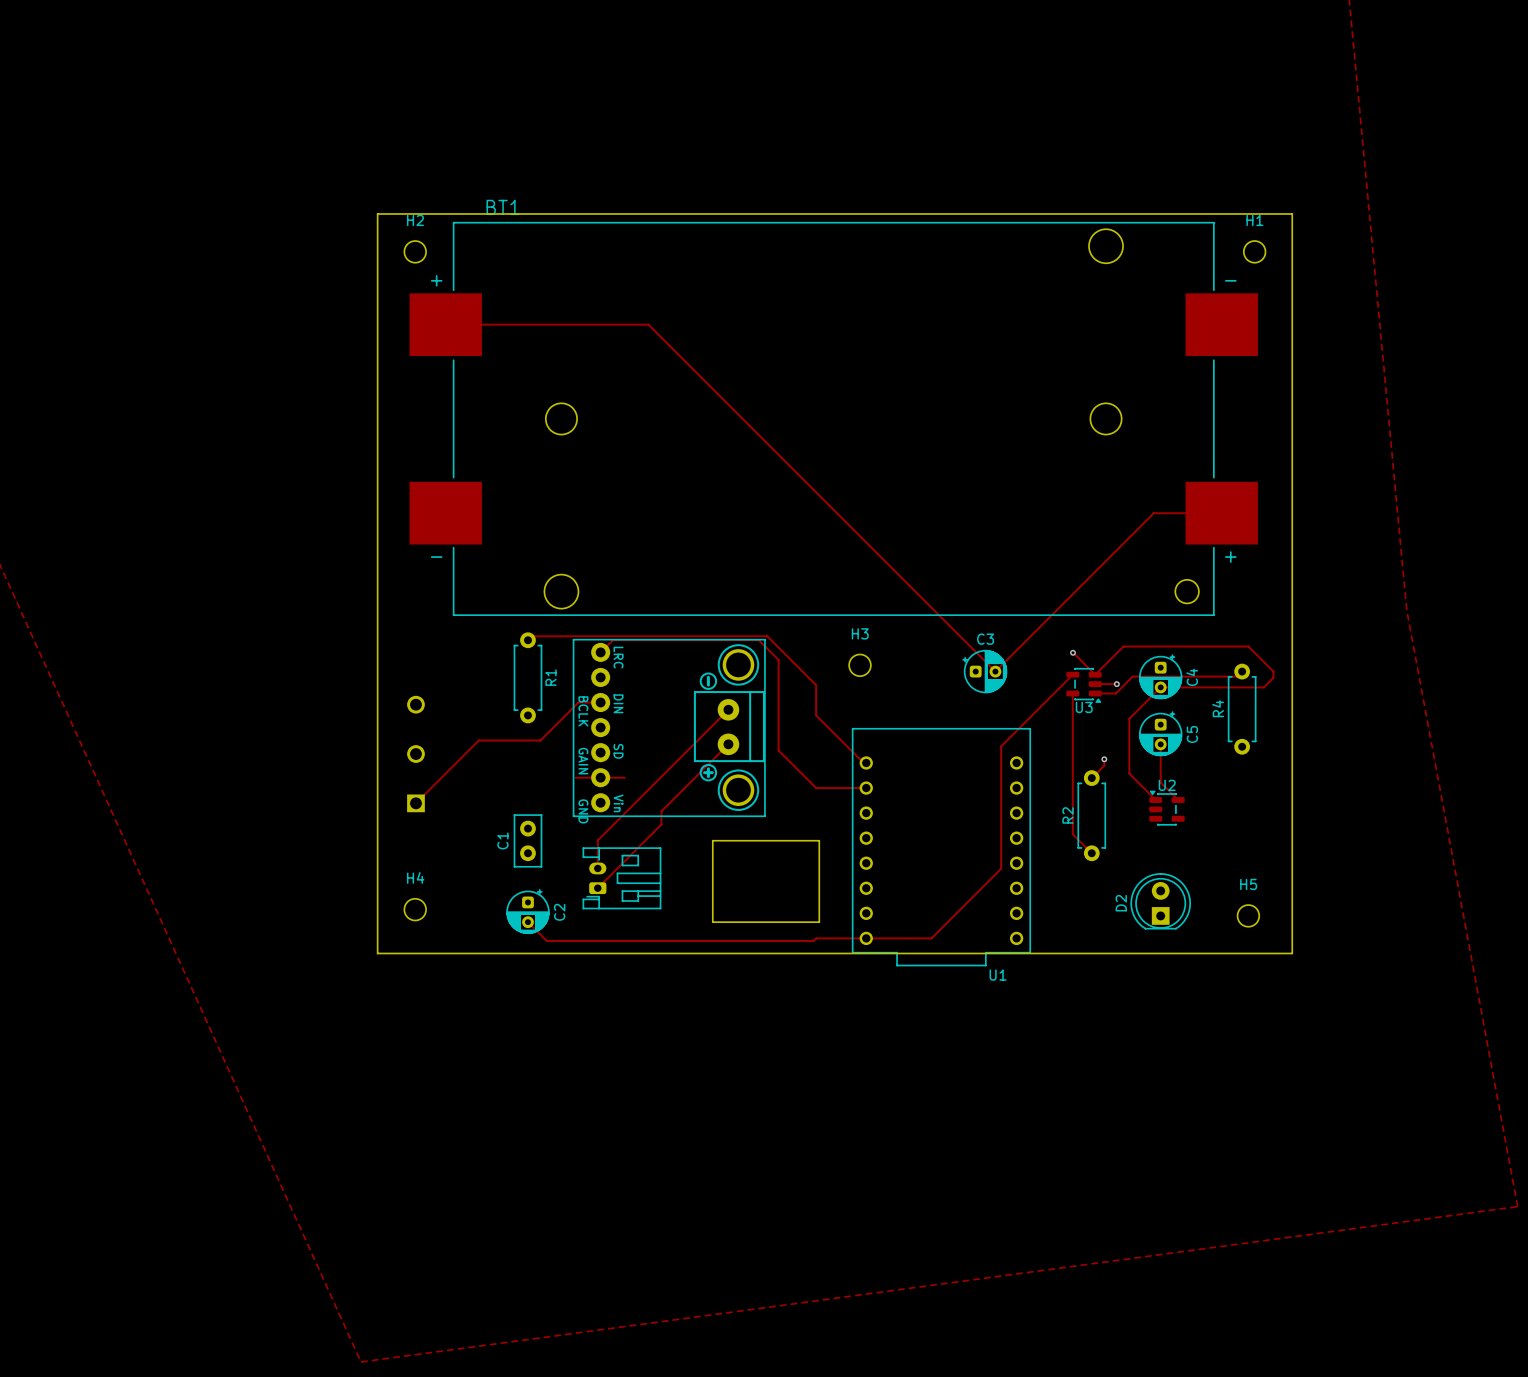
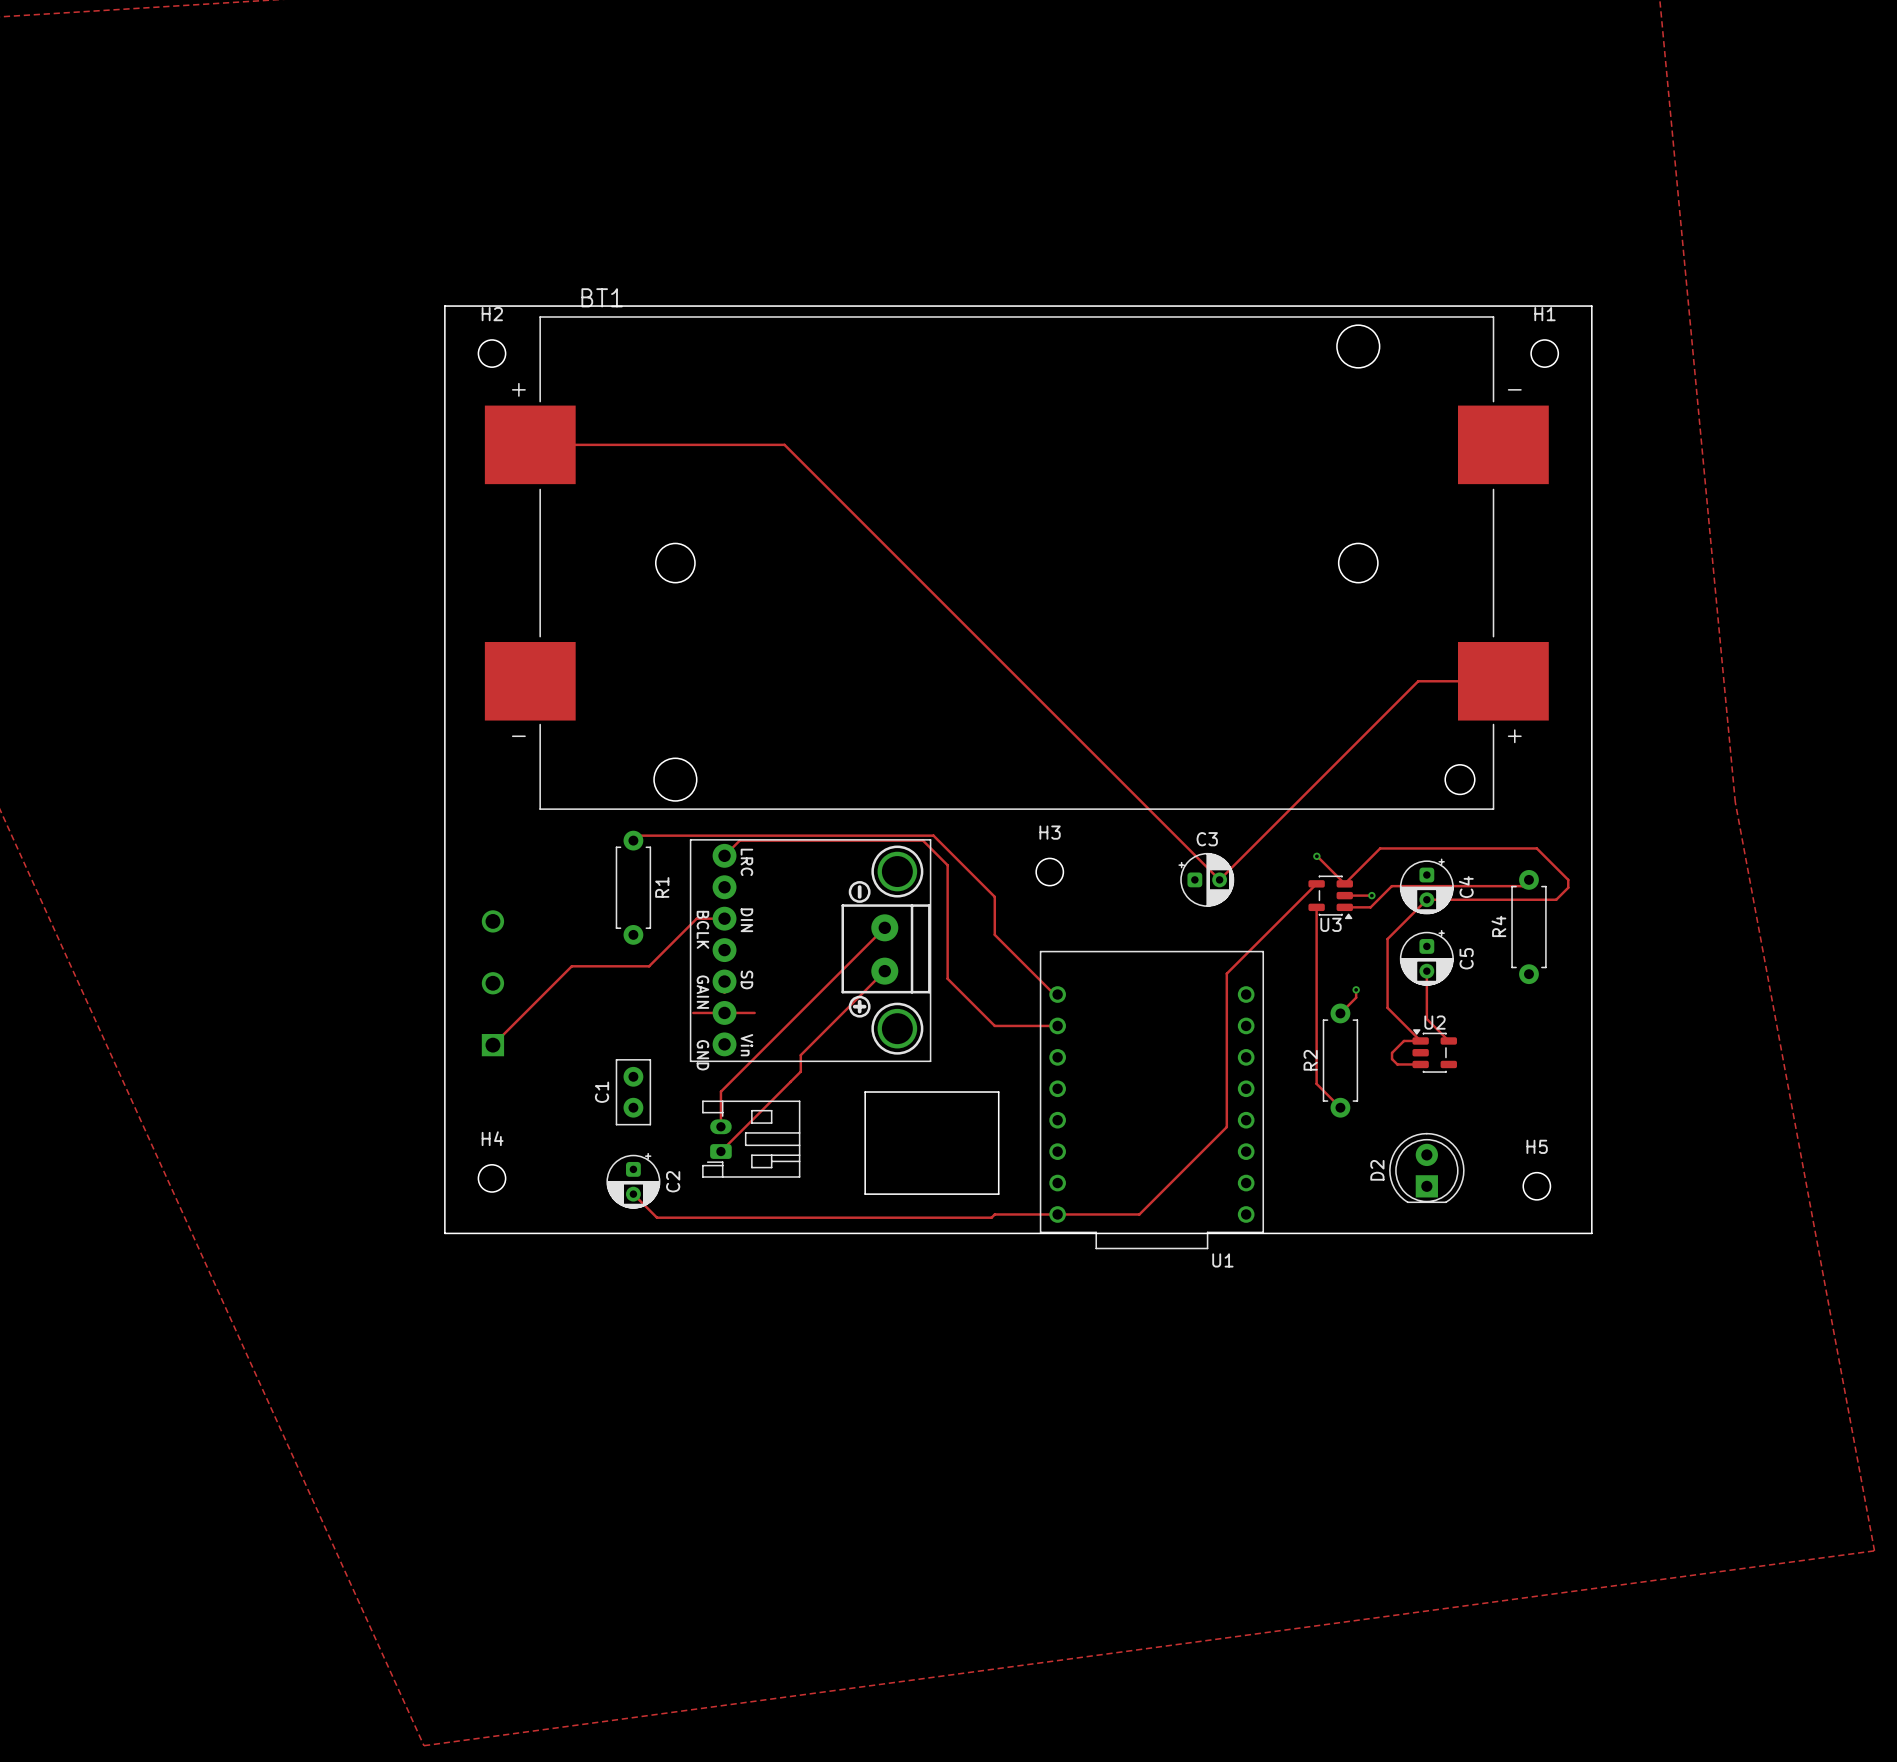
track: none -> (1420, 1040) (1403, 1040) (1392, 1052) (1392, 1059) (1397, 1064) (1420, 1064)

